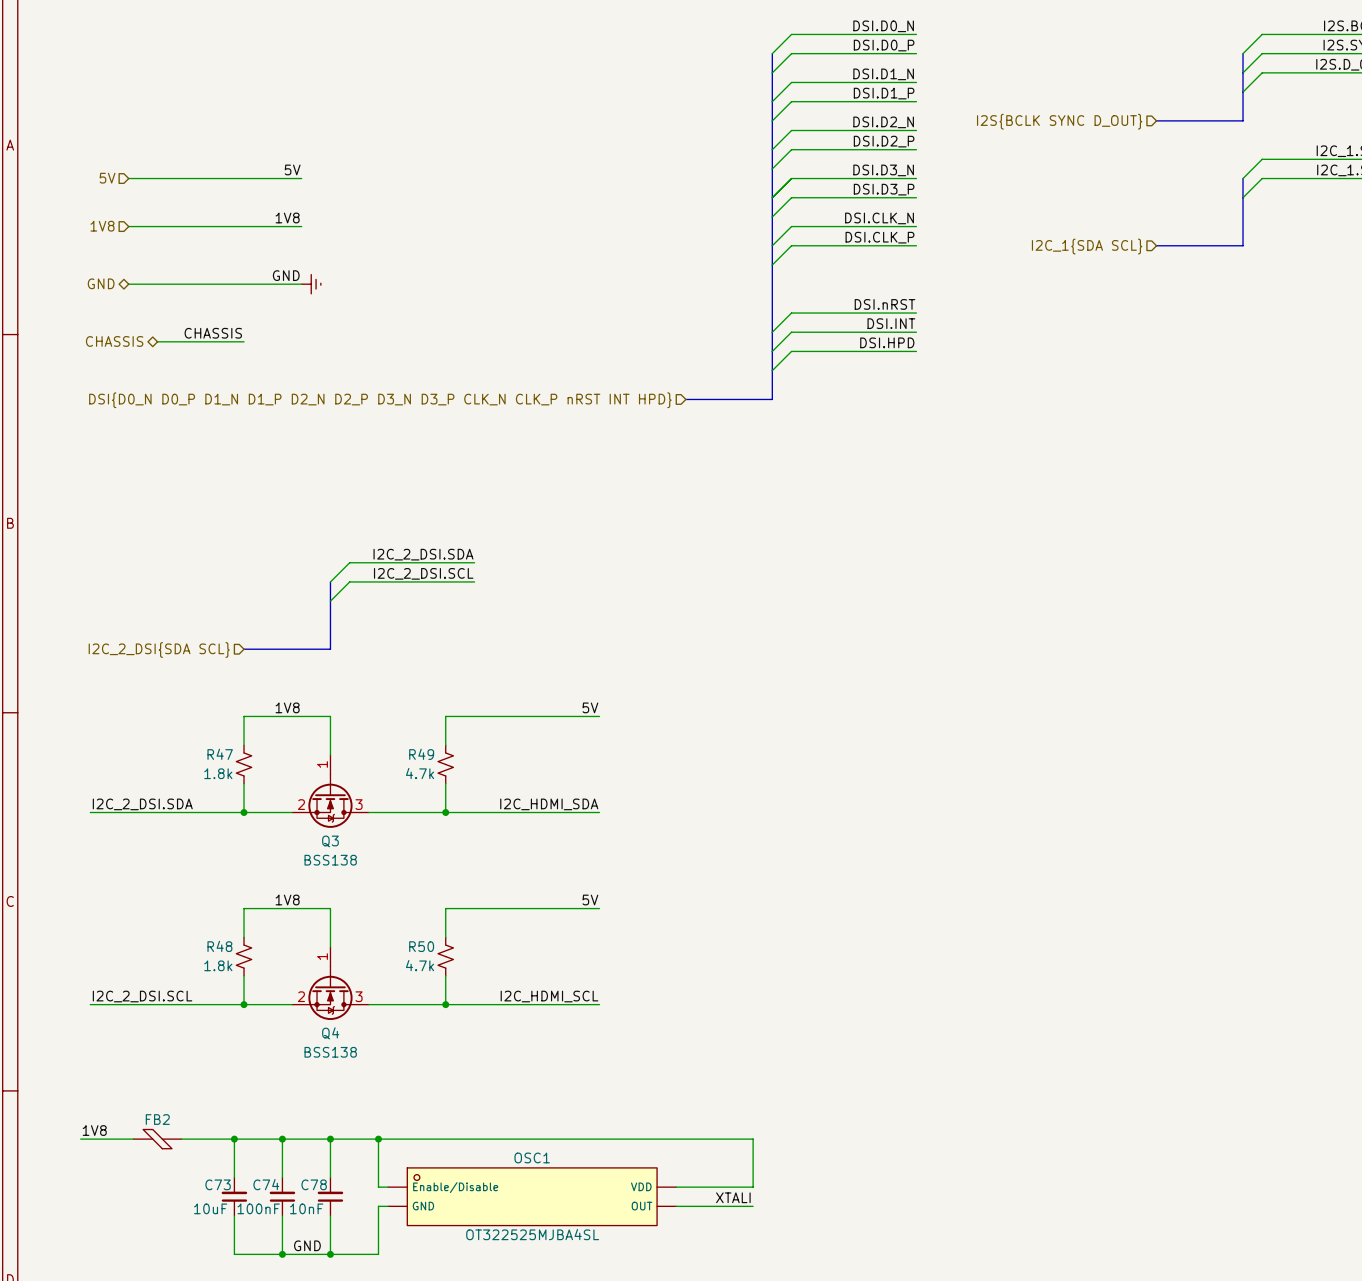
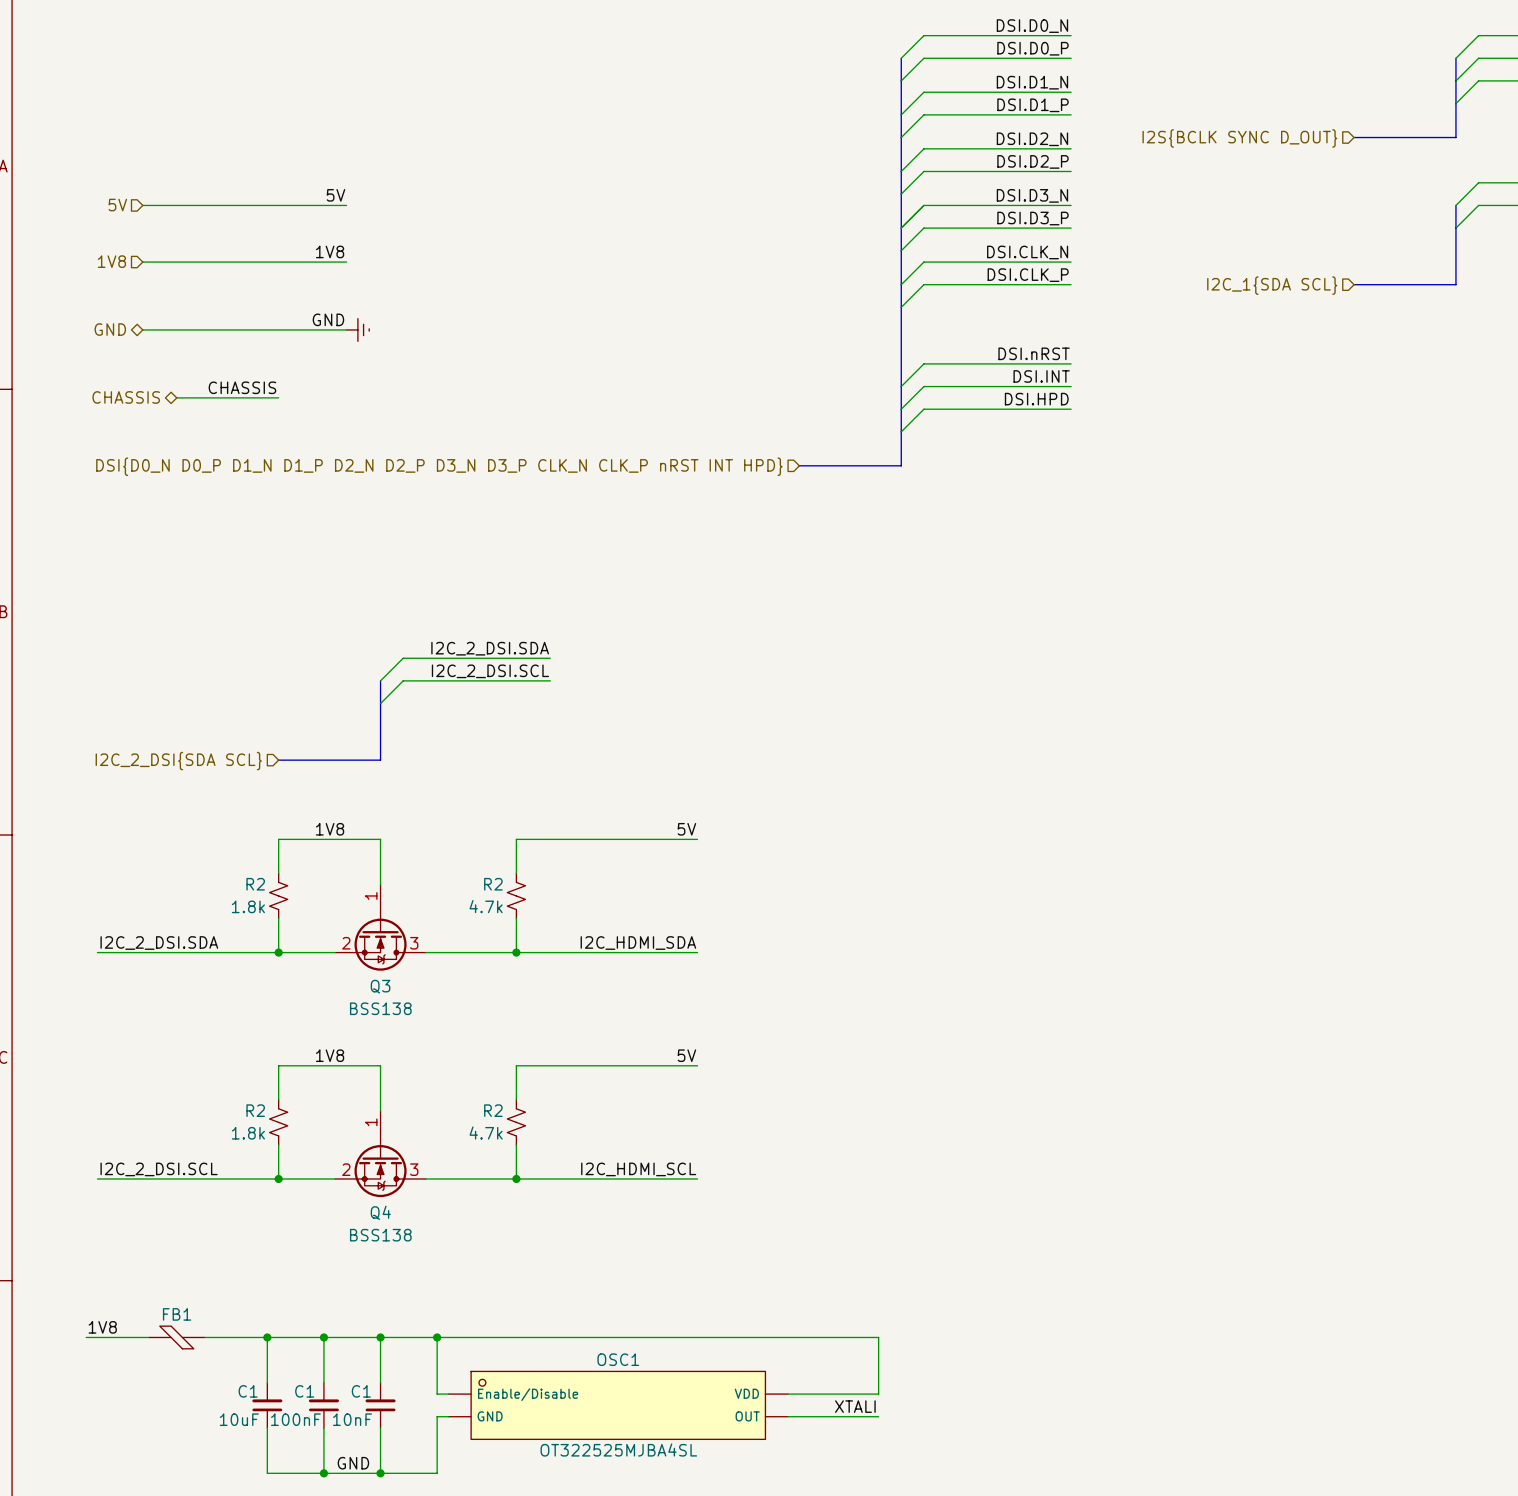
R47 name: R47 (220, 754) -> R2 (255, 884)
R49 name: R49 (421, 754) -> R2 (493, 884)
R48 name: R48 (219, 946) -> R2 (255, 1110)
R50 name: R50 (421, 946) -> R2 (493, 1110)
FB2 name: FB2 (157, 1119) -> FB1 (177, 1314)
C73 name: C73 (218, 1184) -> C1 (248, 1391)
C74 name: C74 (266, 1184) -> C1 (304, 1391)
C78 name: C78 (314, 1184) -> C1 (361, 1391)

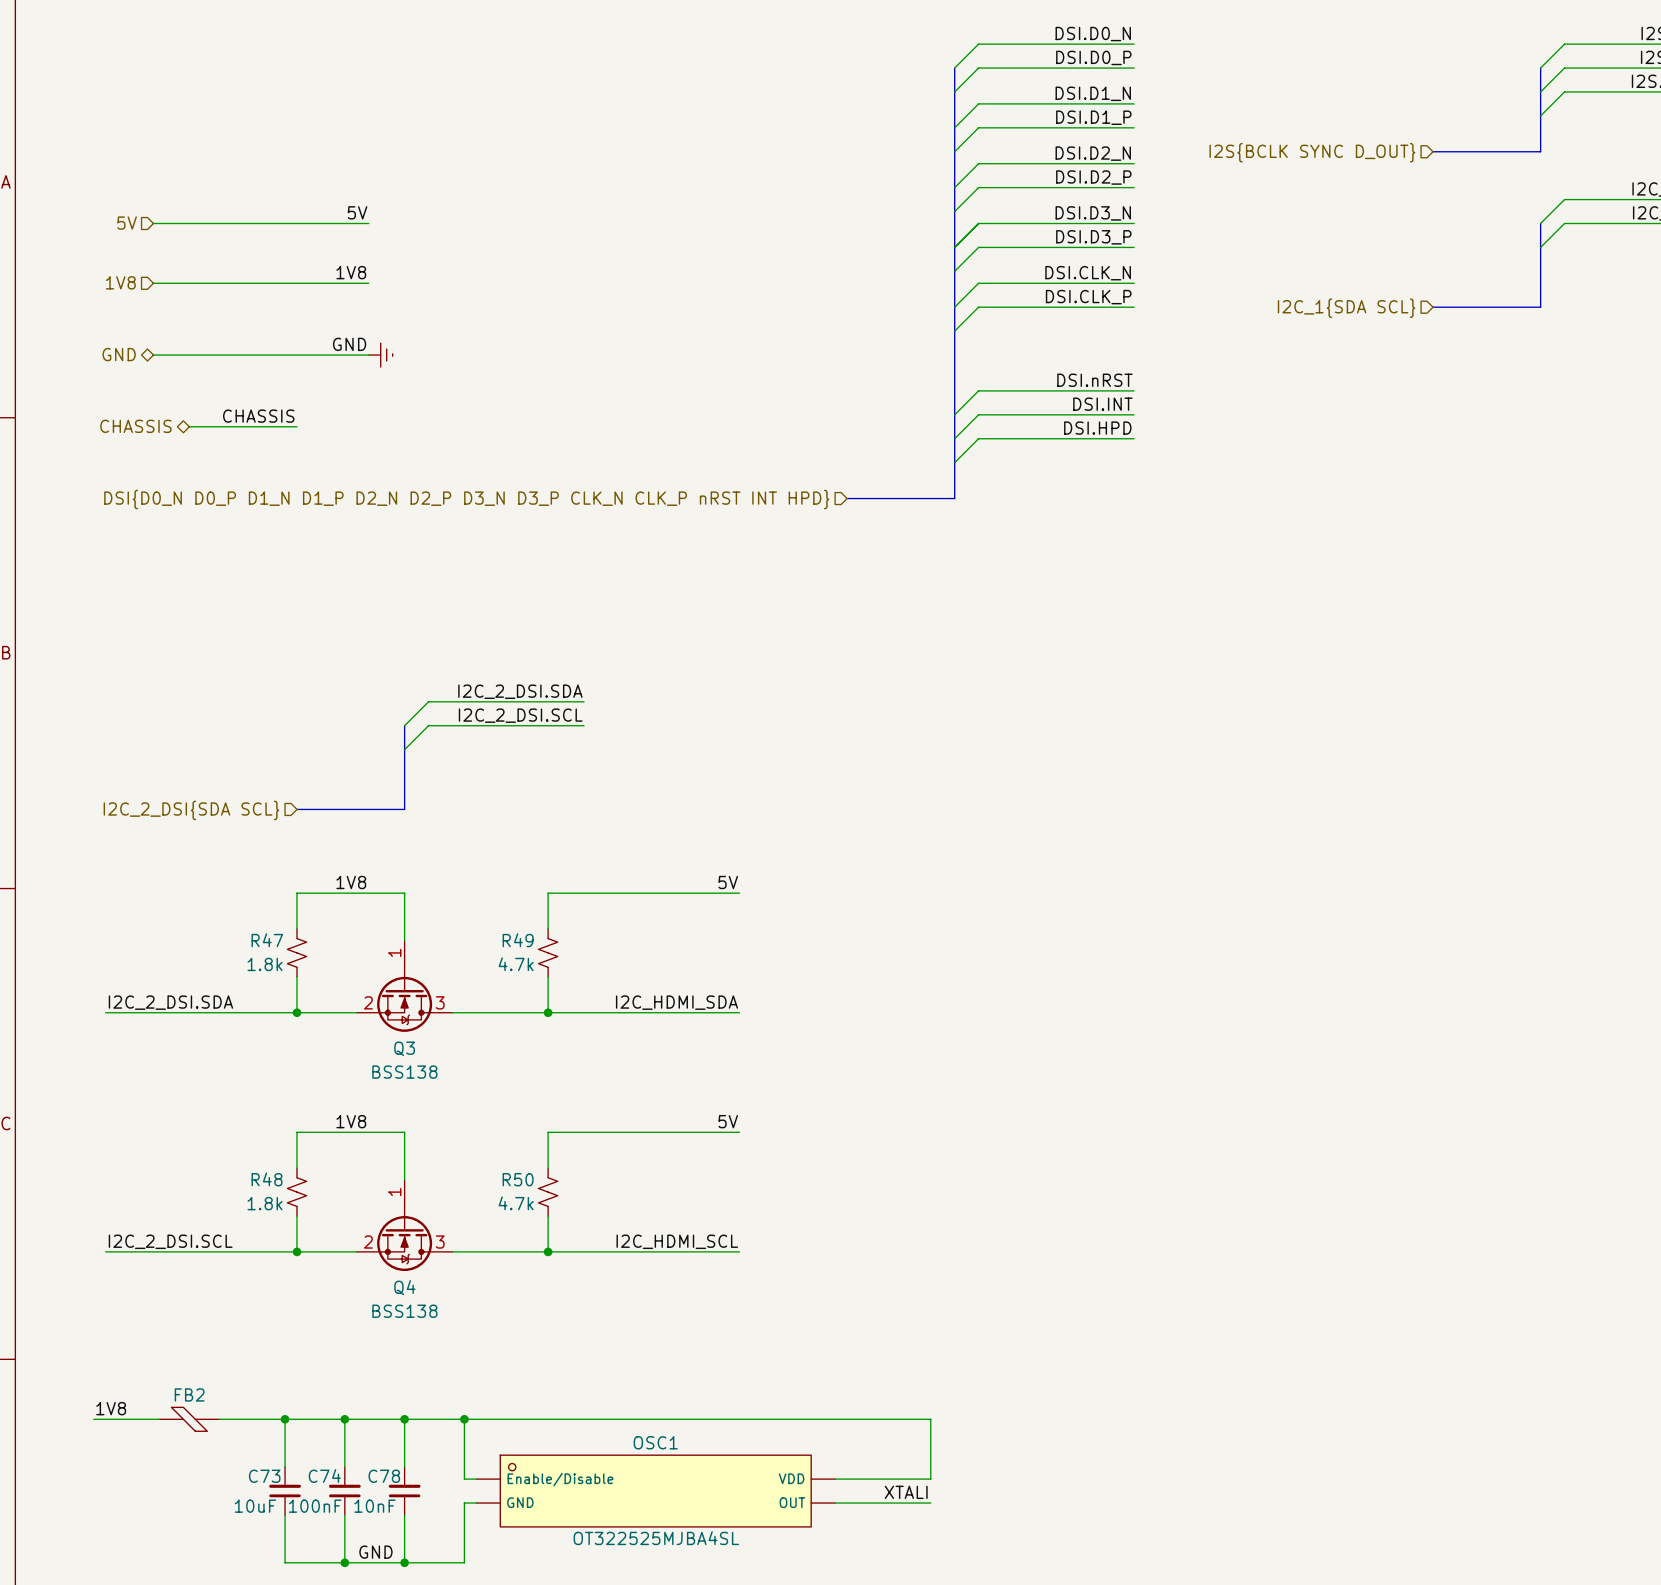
R2 name: R2 (255, 884) -> R47 (267, 940)
R2 name: R2 (493, 884) -> R49 (518, 940)
R2 name: R2 (255, 1110) -> R48 (267, 1179)
R2 name: R2 (493, 1110) -> R50 (518, 1179)
FB1 name: FB1 (177, 1314) -> FB2 (189, 1394)
C1 name: C1 (248, 1391) -> C73 (264, 1476)
C1 name: C1 (304, 1391) -> C74 (324, 1475)
C1 name: C1 (361, 1391) -> C78 (384, 1476)

